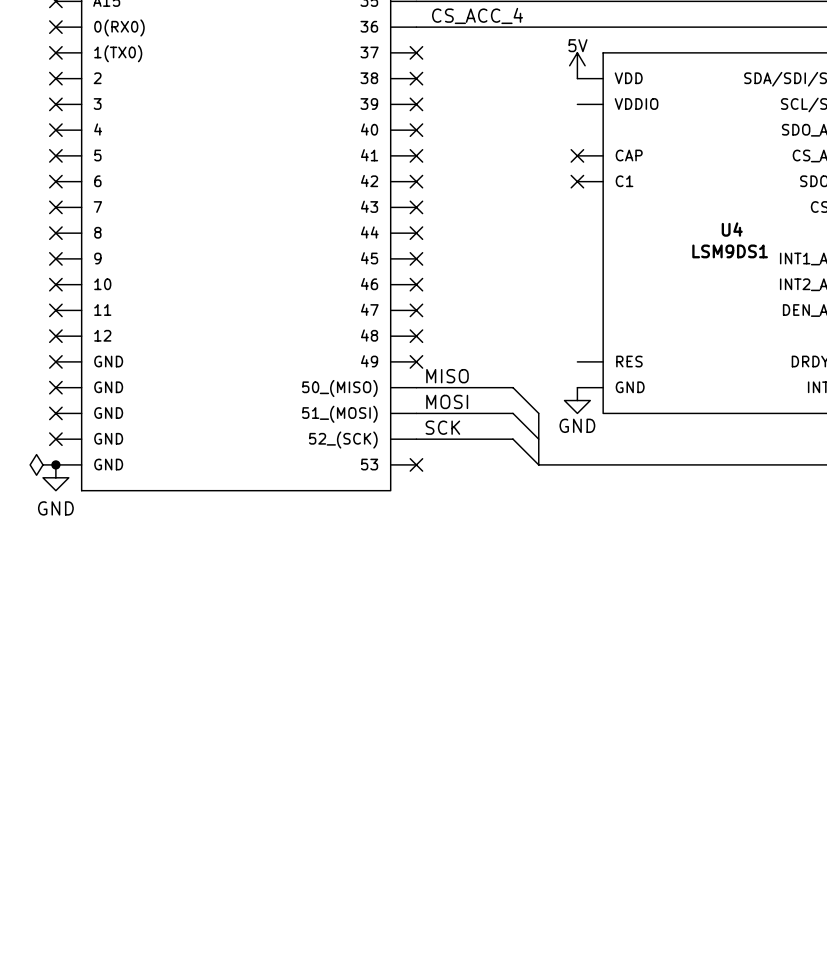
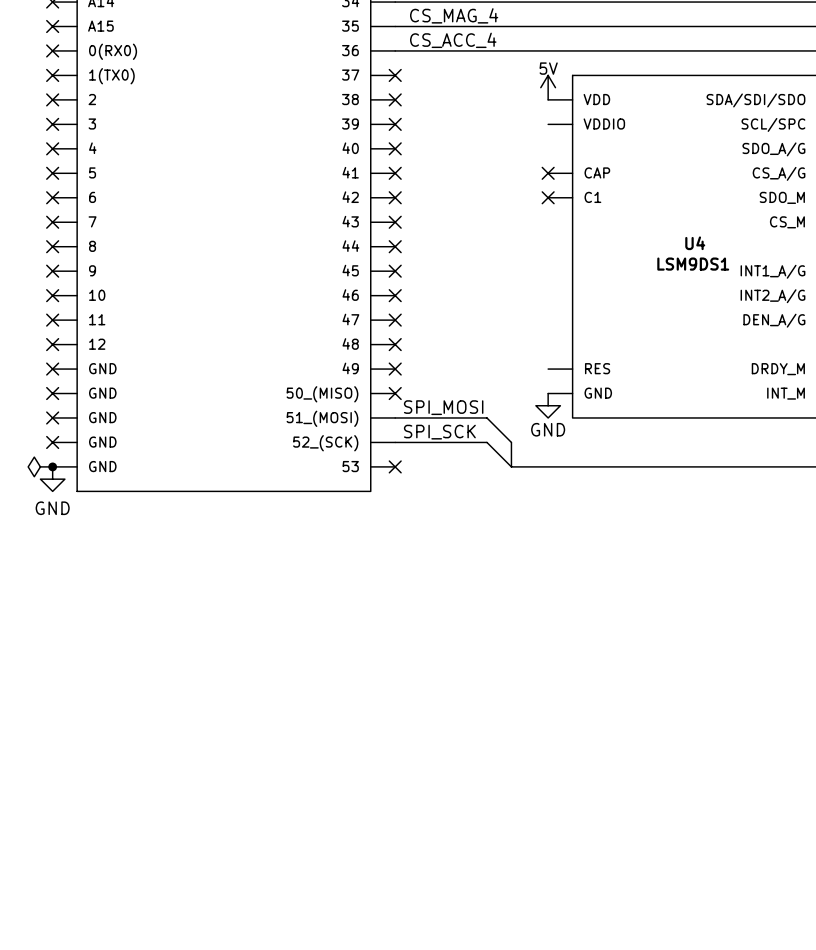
label: MISO (447, 376) -> none
wire: (416, 387) (513, 387) (538, 413) -> none
no-connect mark: none -> (395, 393)
label: MOSI (447, 401) -> SPI_MOSI (443, 407)
bus: (538, 413) (538, 439) -> none
label: SCK (442, 427) -> SPI_SCK (439, 432)

